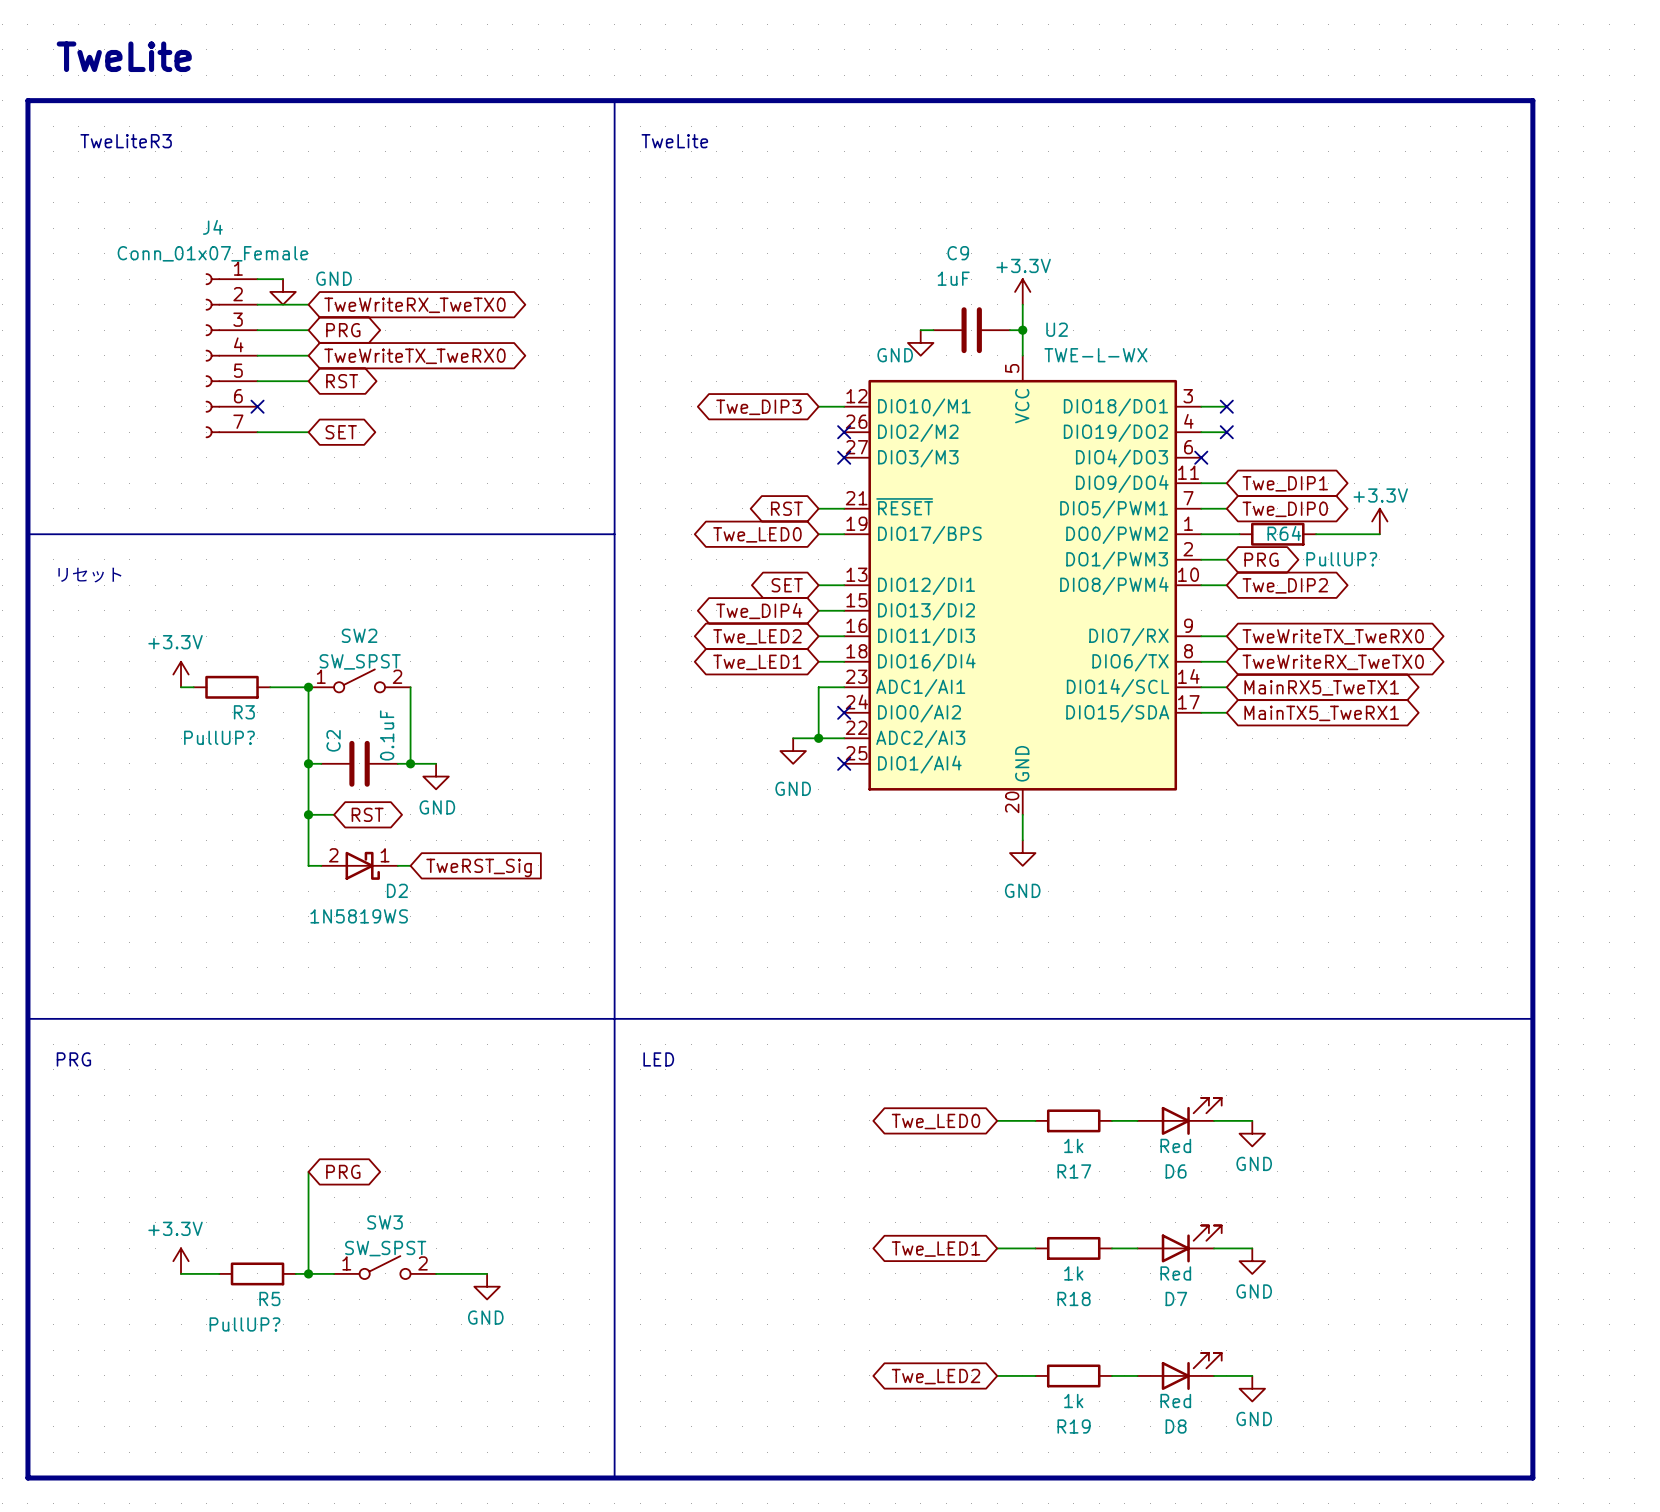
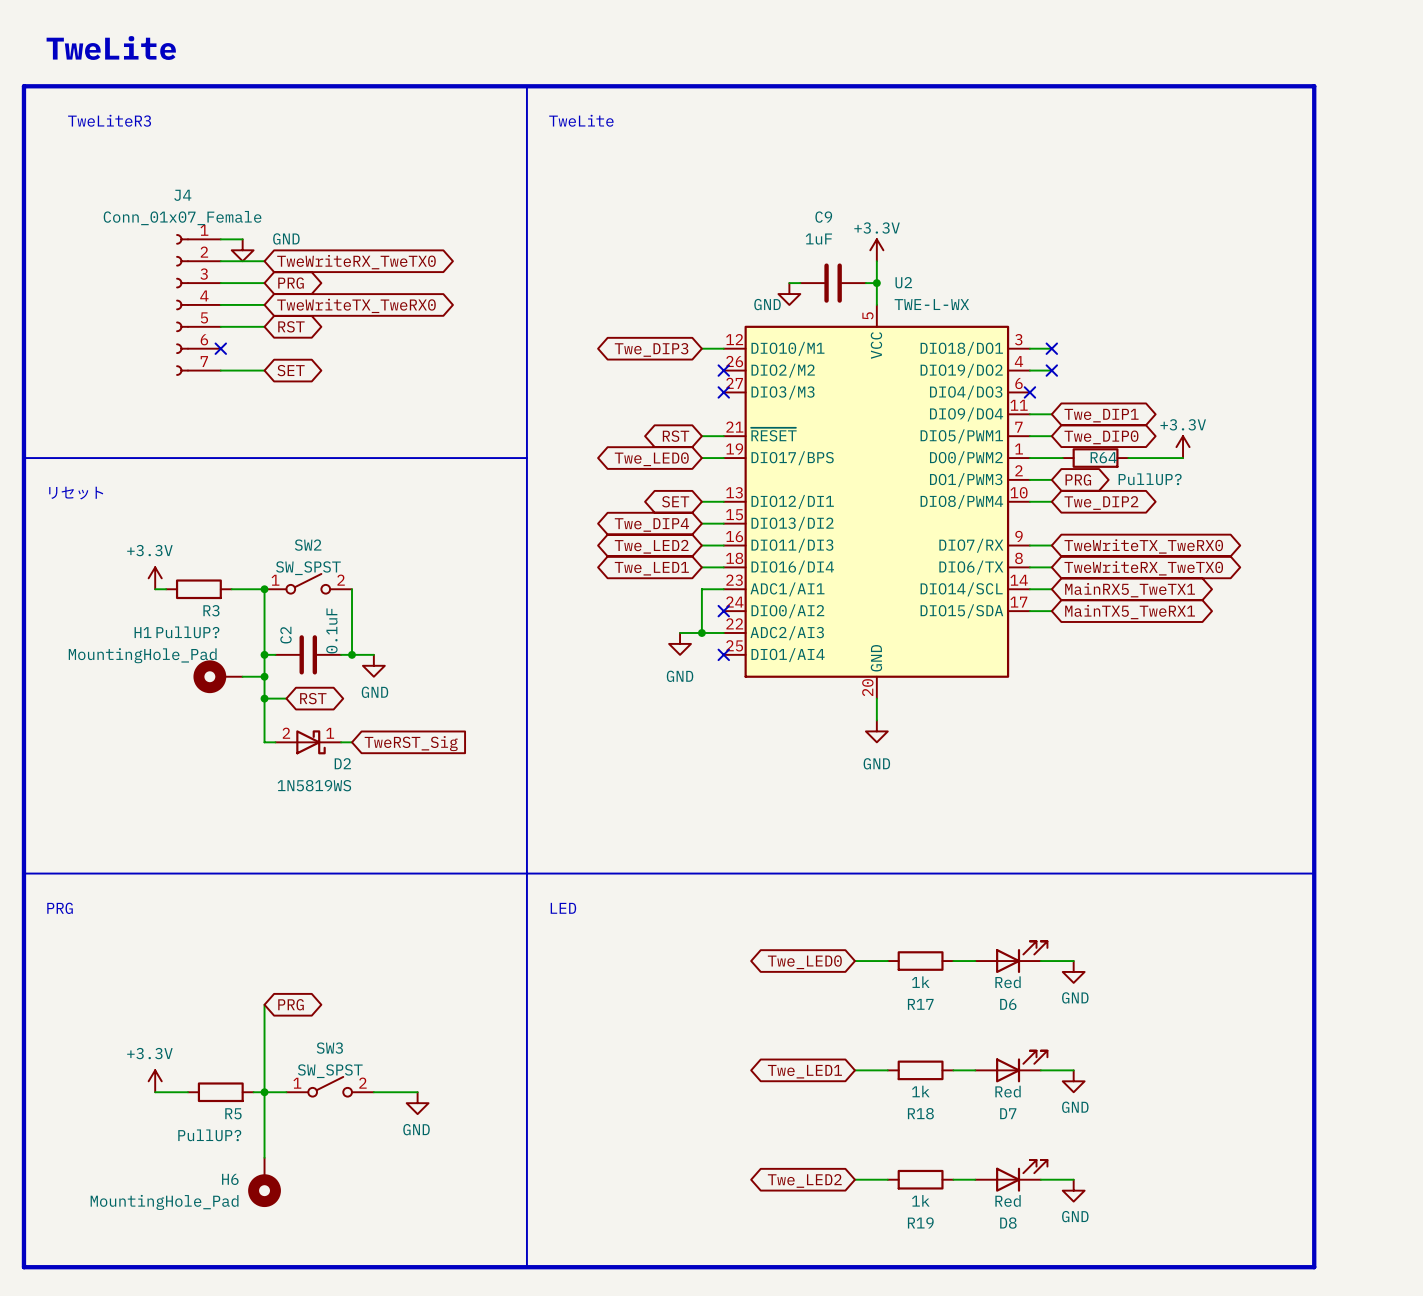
H1: none -> MountingHole_Pad (218, 676)
wire: none -> (242, 676) (264, 676)
junction: none -> (264, 676)
wire: none -> (264, 1092) (264, 1157)
H6: none -> MountingHole_Pad (264, 1182)

